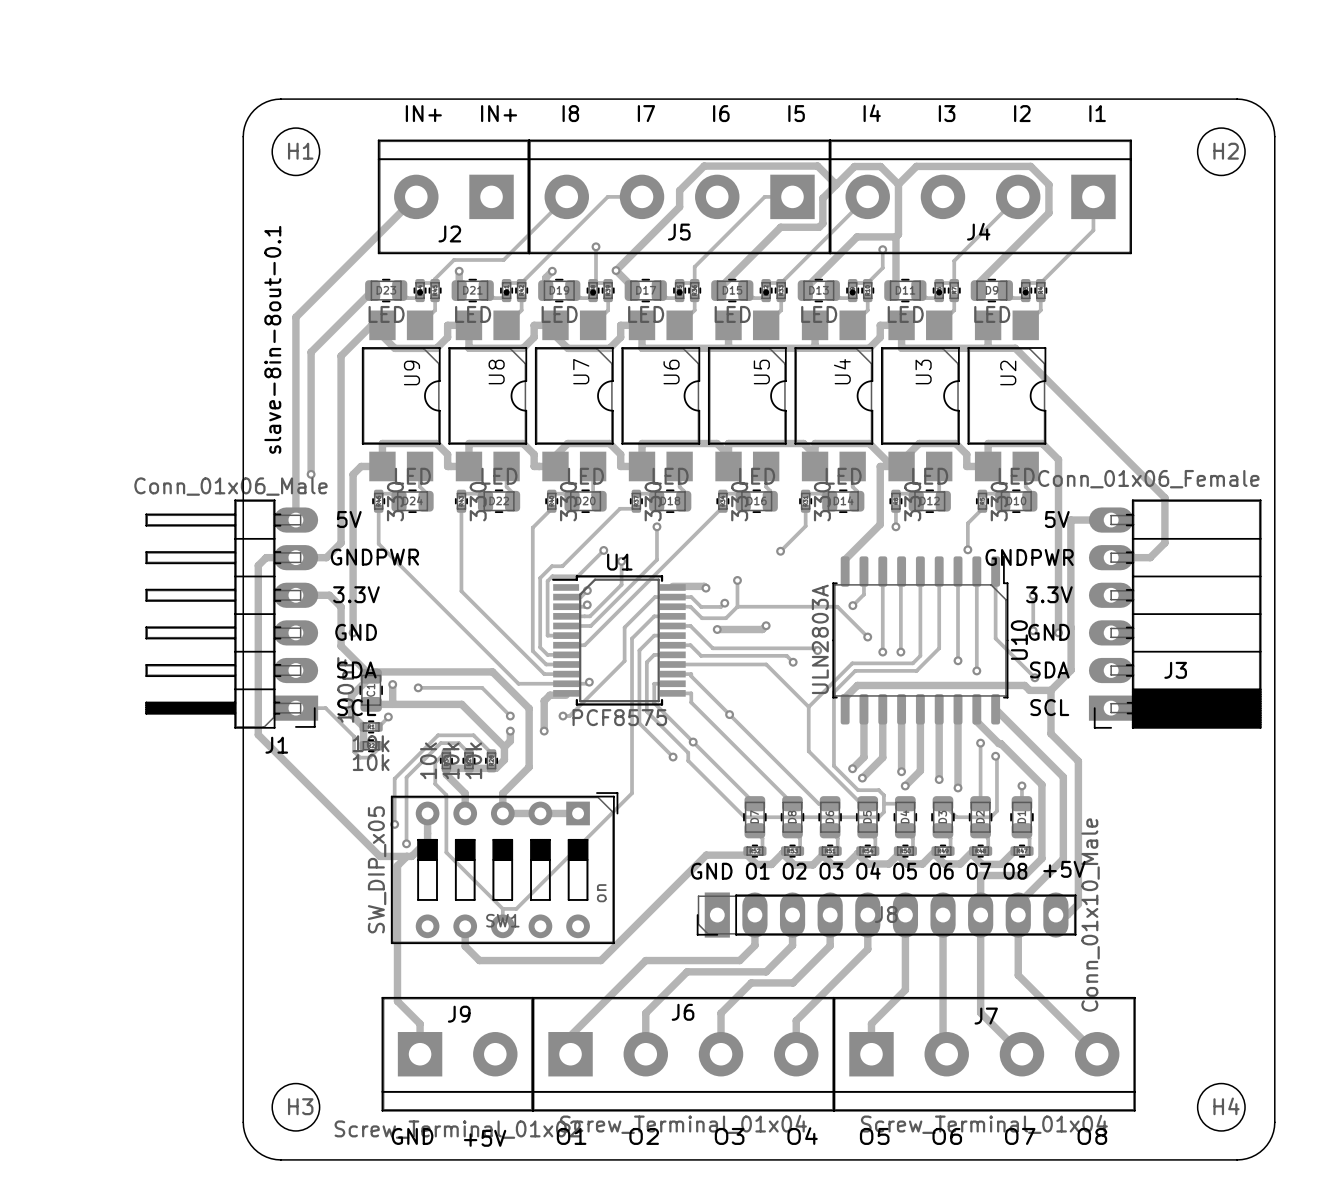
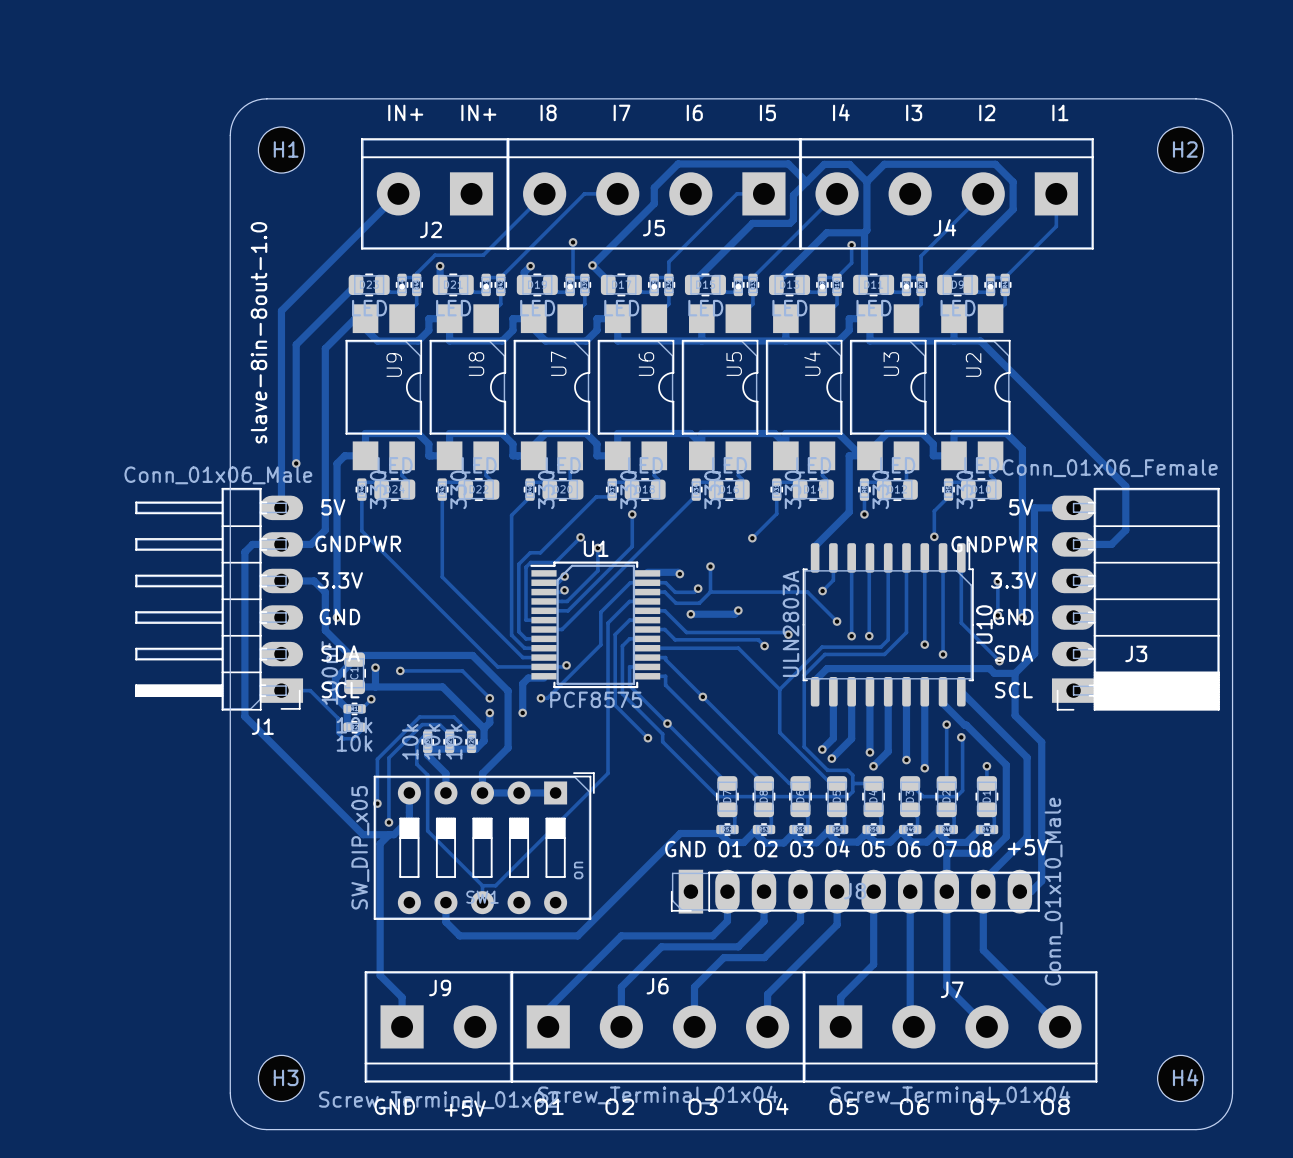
text: slave-8in-8out-0.1 (272, 339) -> slave-8in-8out-1.0 (258, 332)

